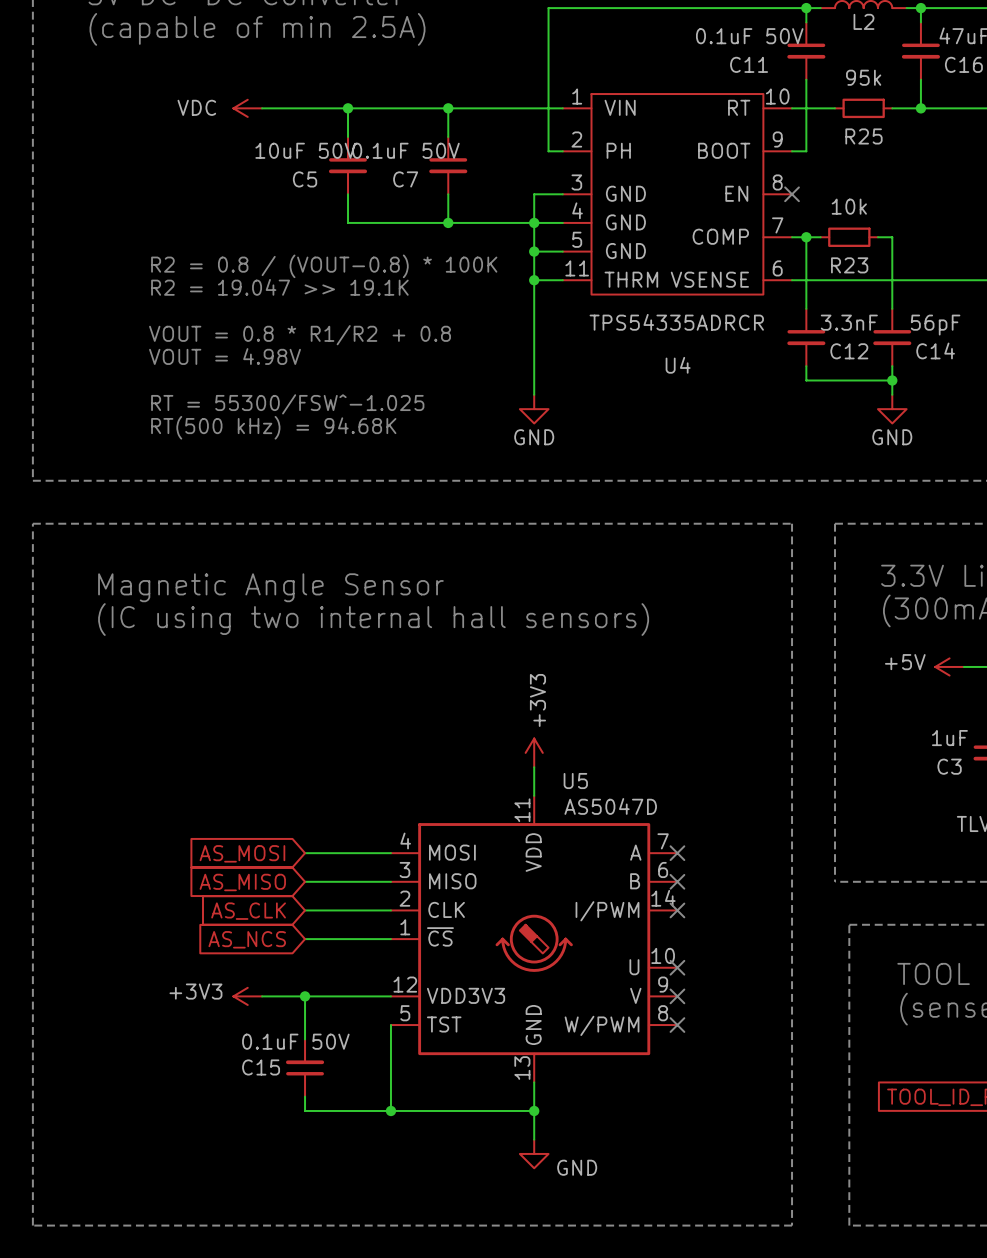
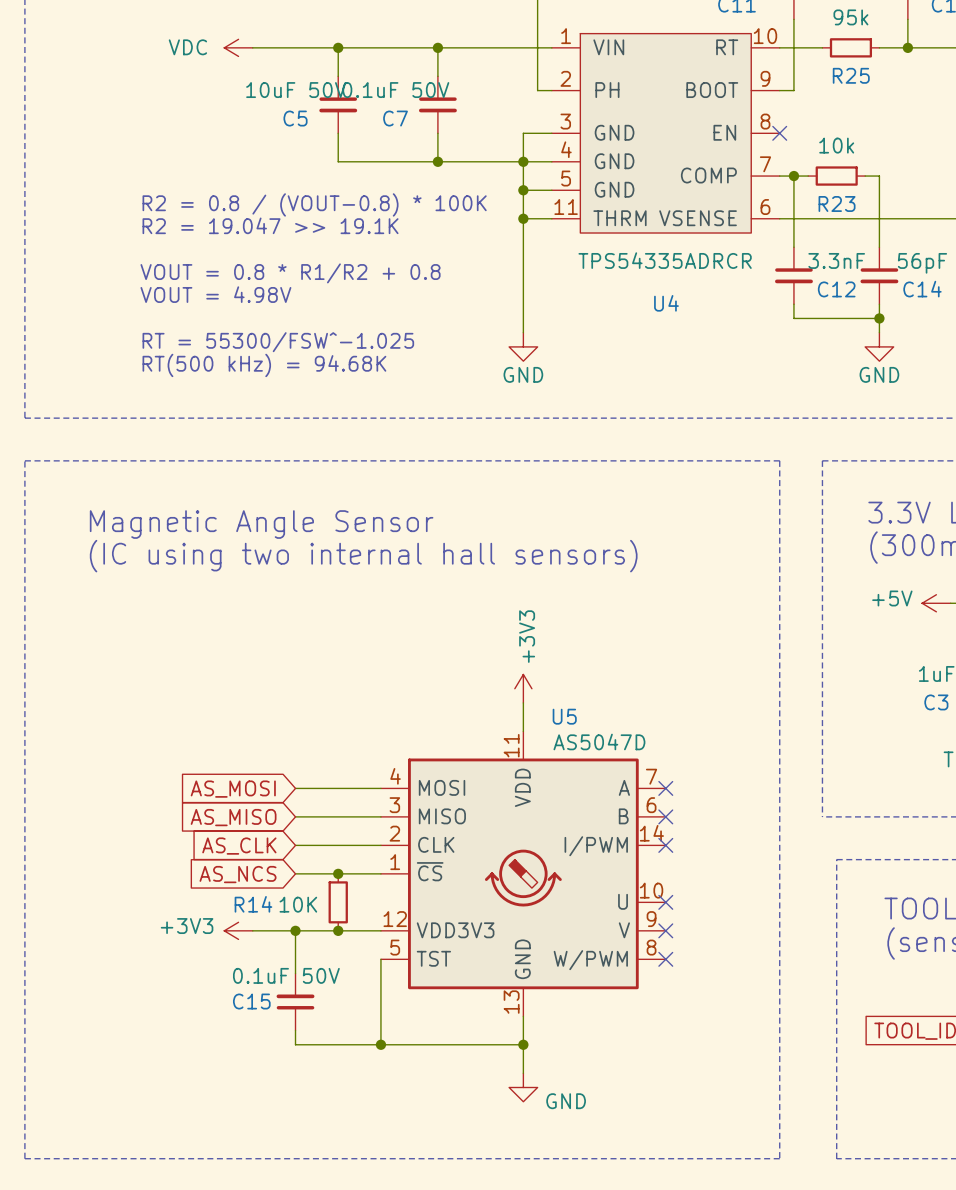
junction: none -> (338, 873)
R14: none -> 10K (338, 902)
junction: none -> (338, 930)

